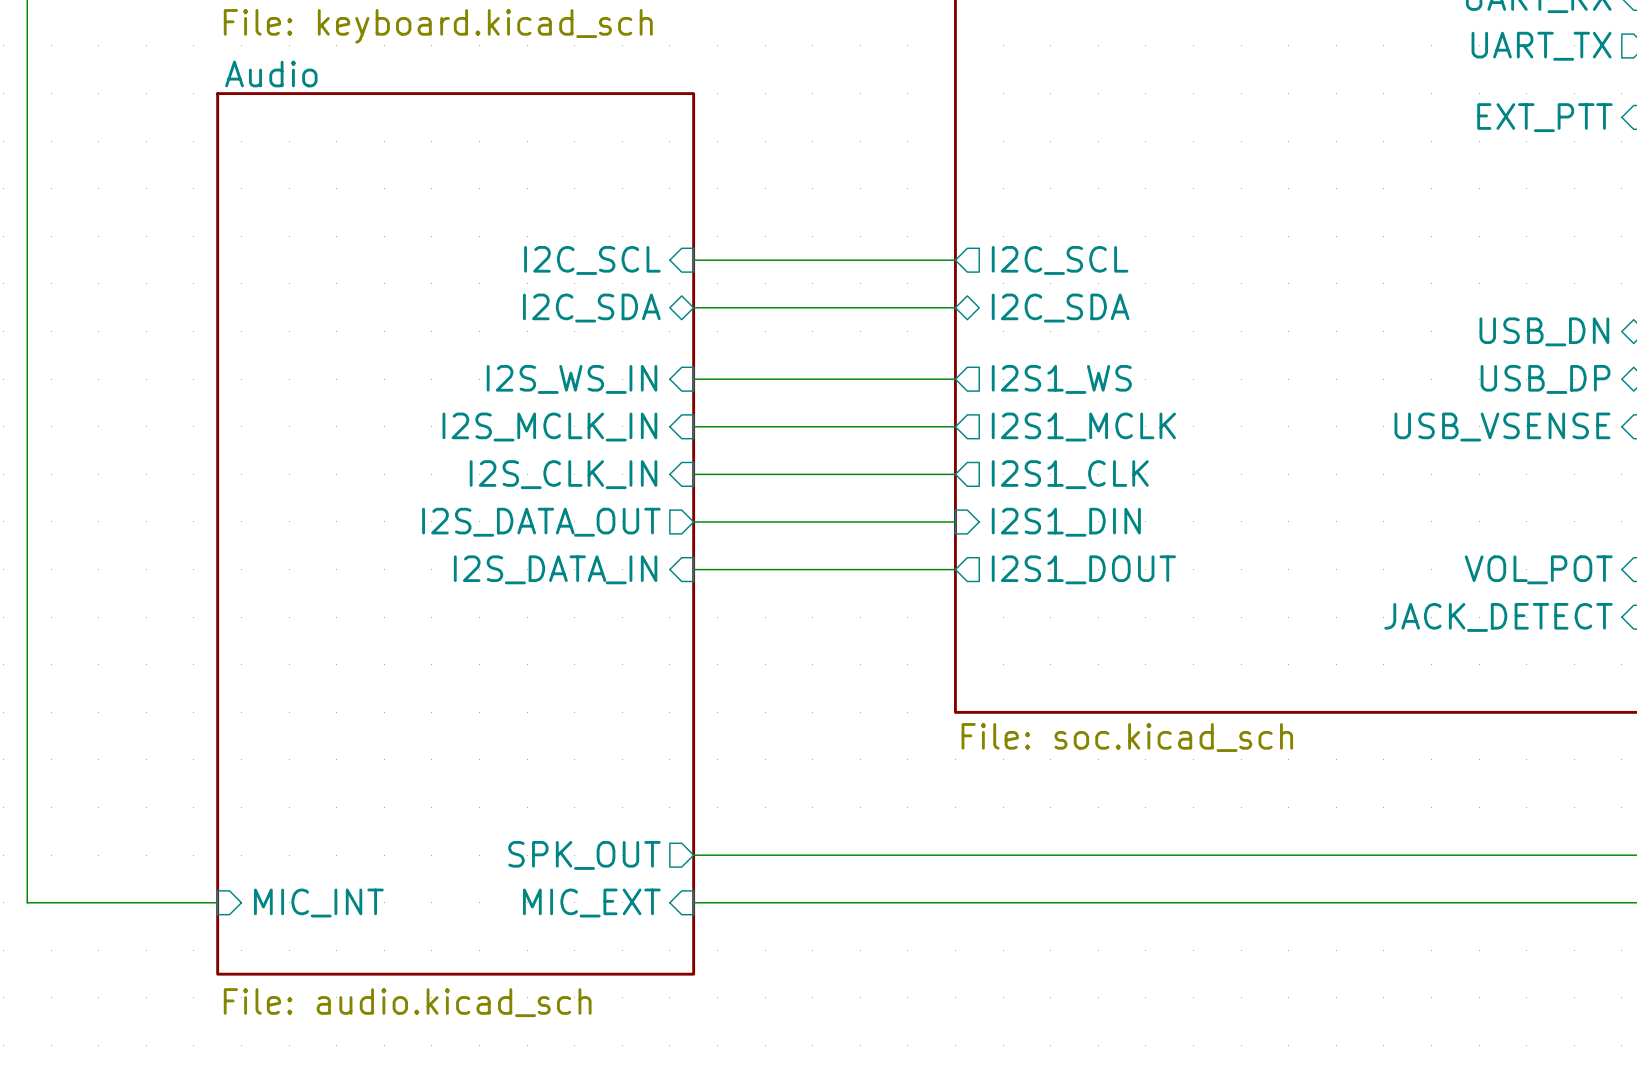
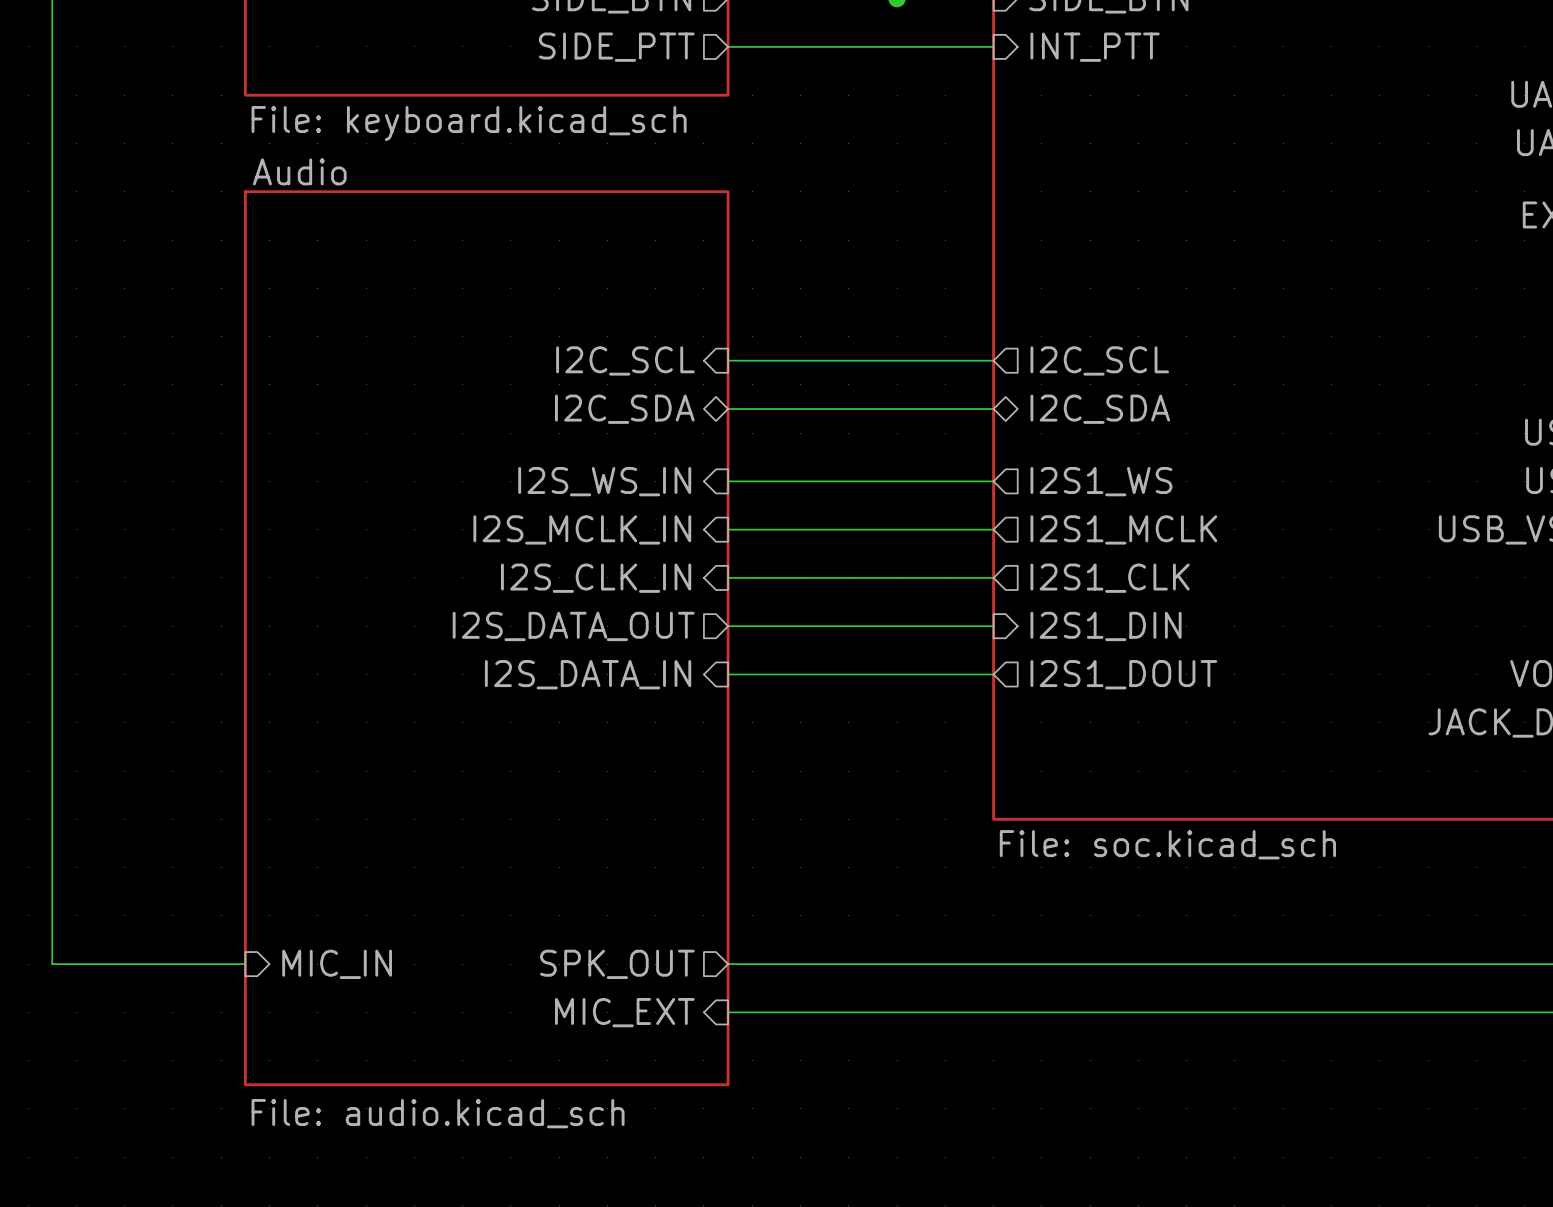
wire: (27, 855) (27, 902) (217, 902) -> (52, 964) (245, 964)
sheet pin: MIC_INT (318, 903) -> MIC_IN (337, 964)

